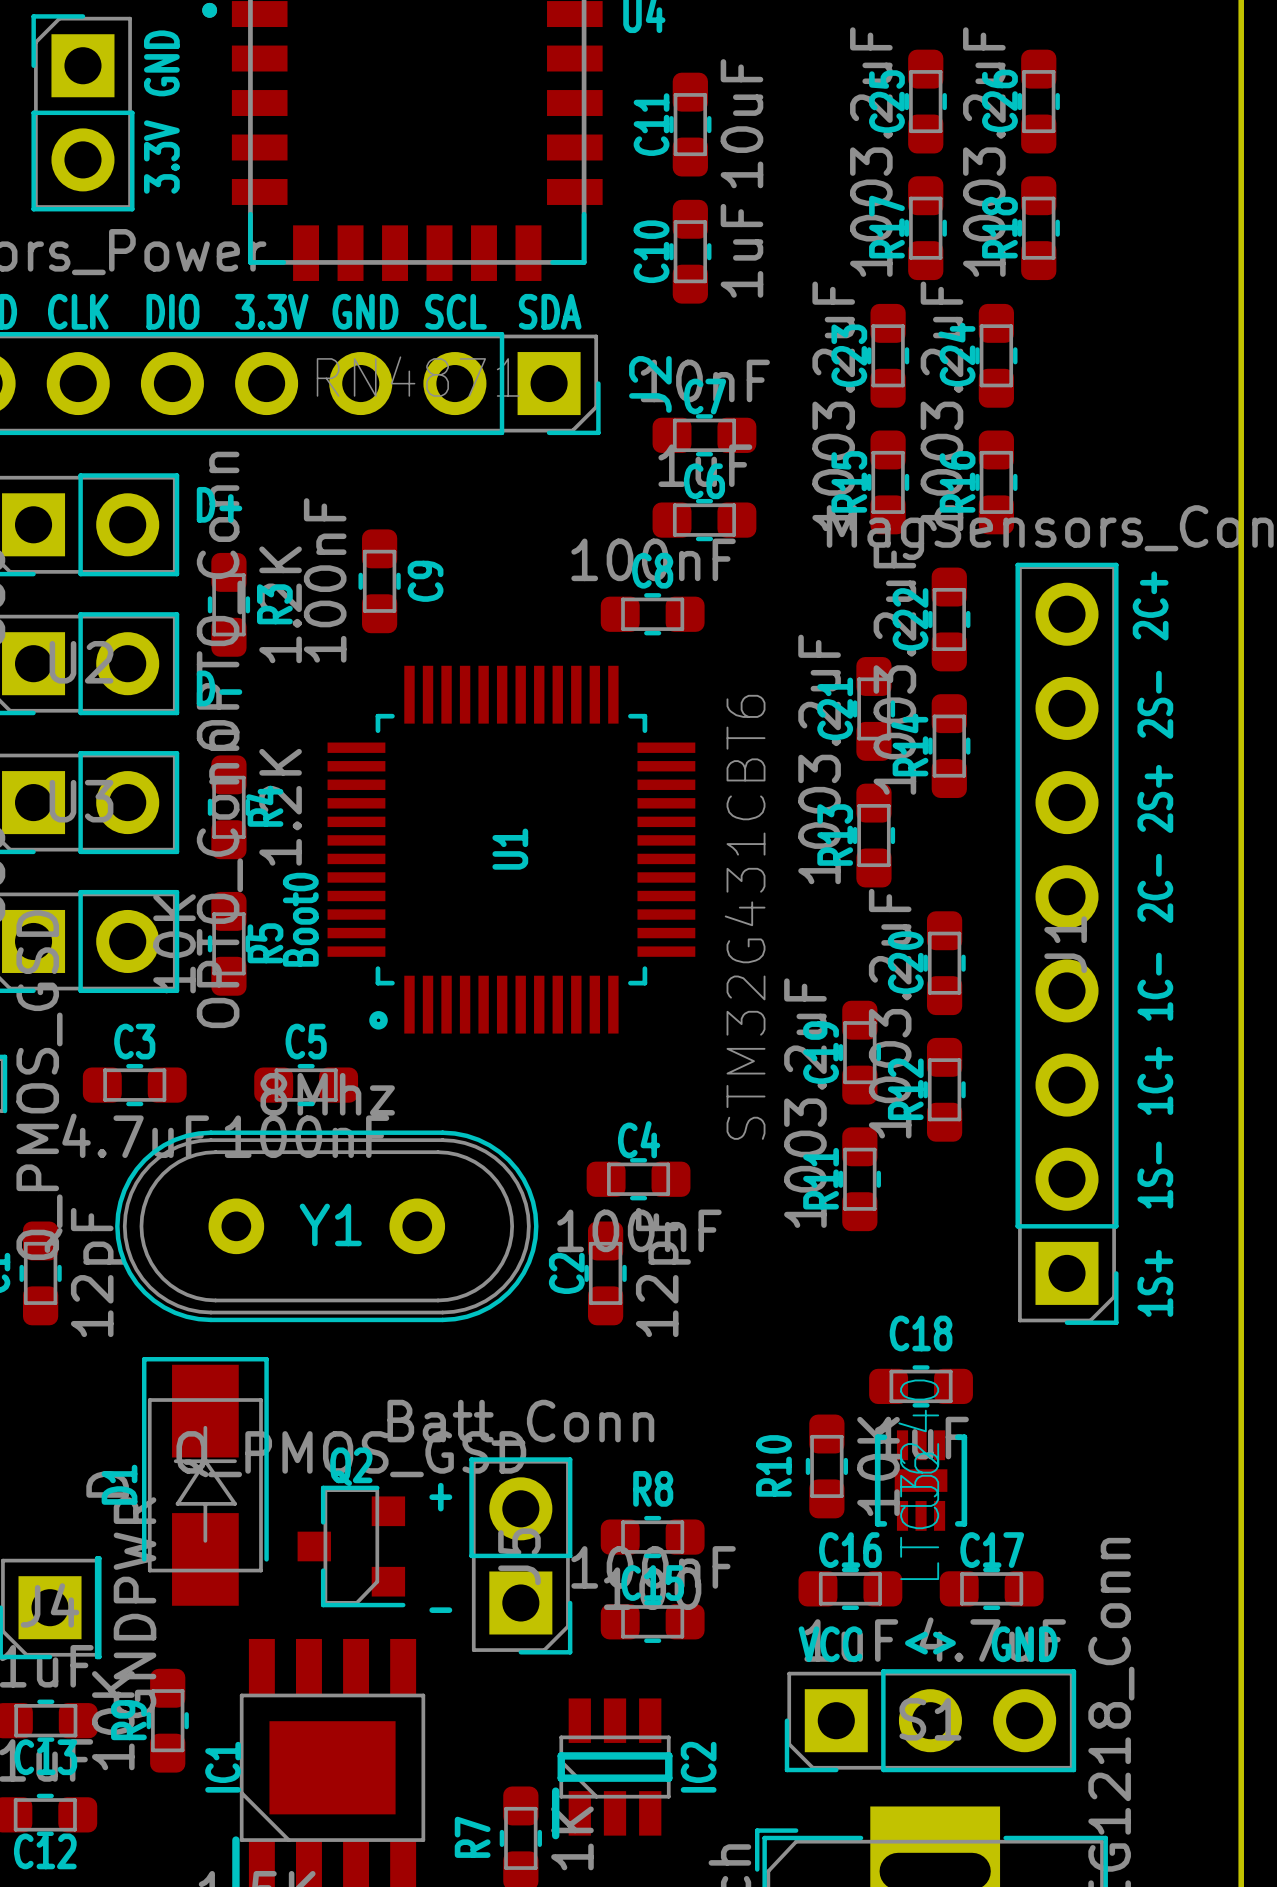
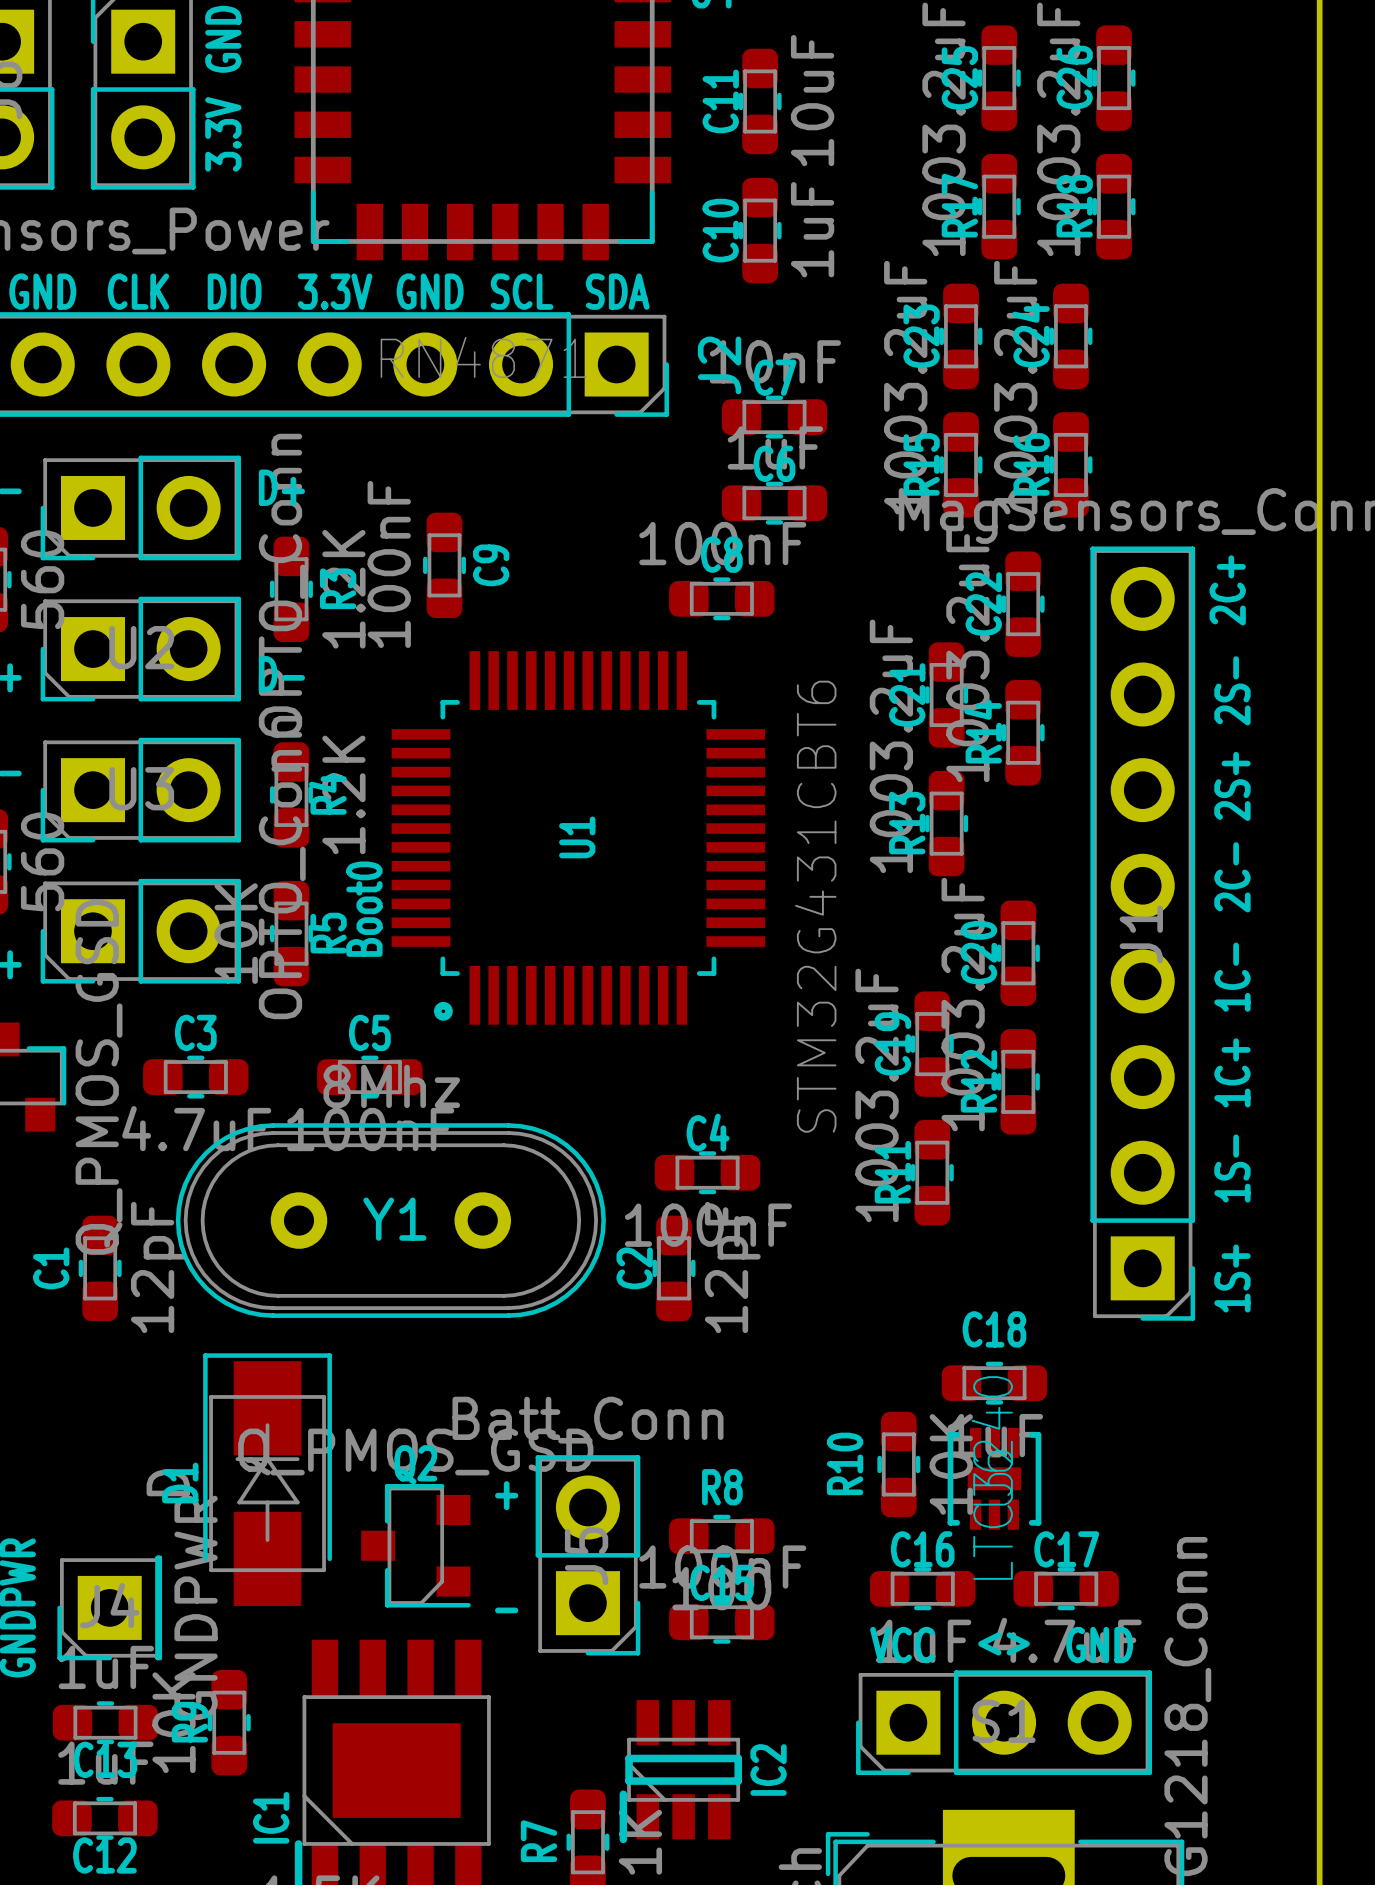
IC1 name position: IC1 (223, 1767) -> IC1 (271, 1817)

